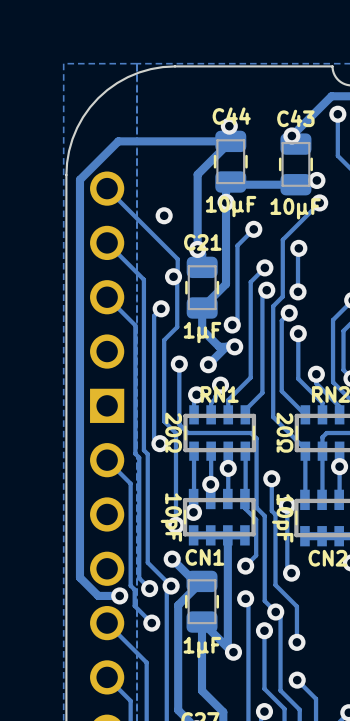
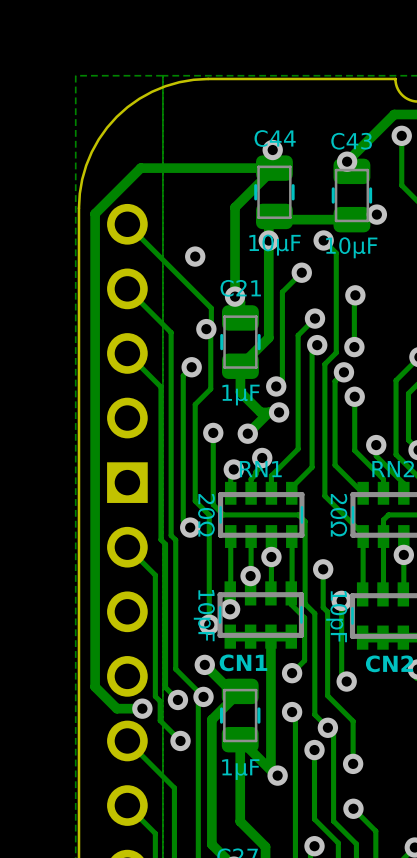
track: (319, 202) (282, 239) -> (323, 240) (336, 253) (336, 285)
via position: (319, 202) -> (323, 240)

